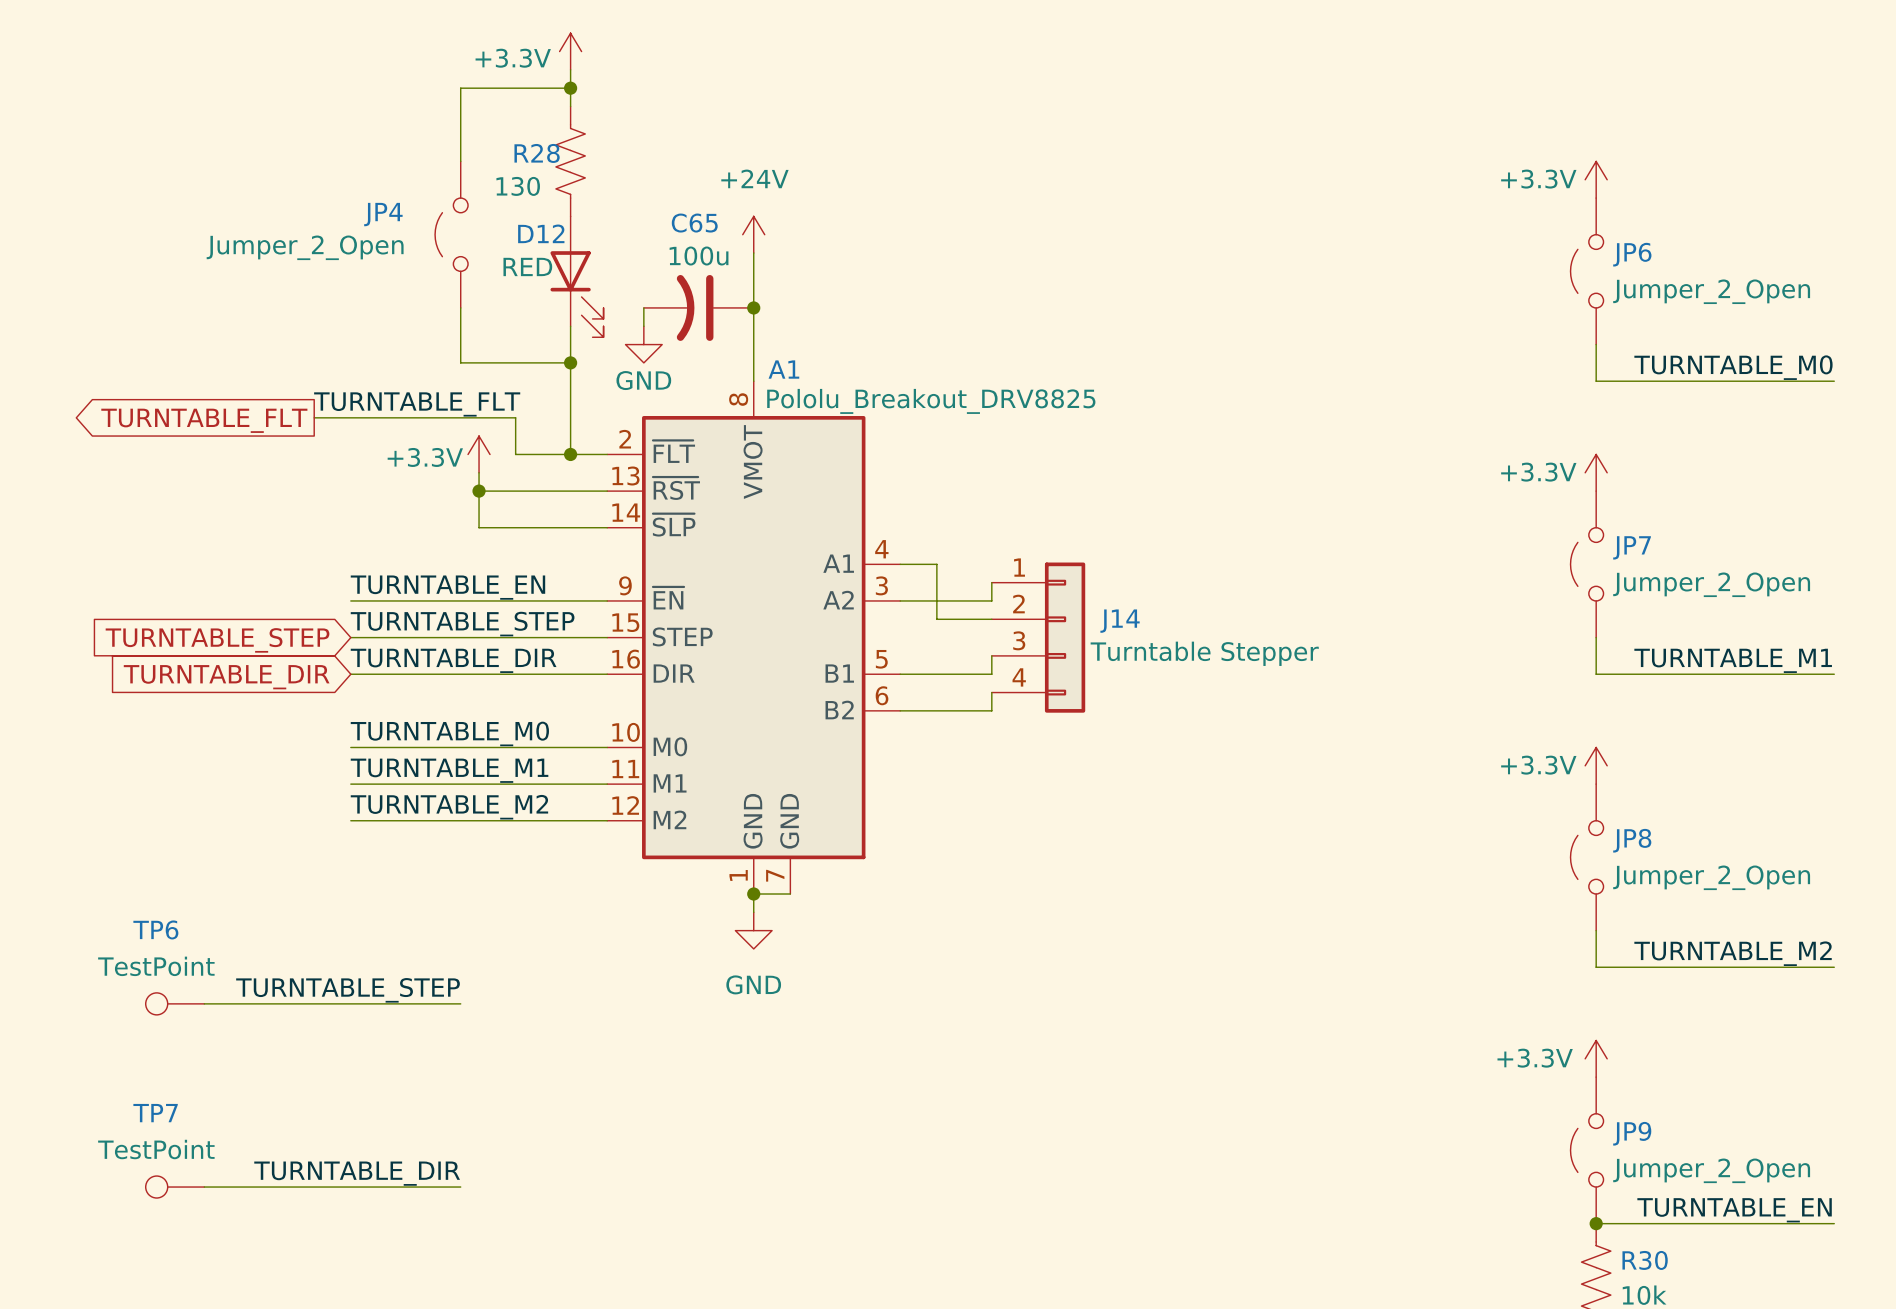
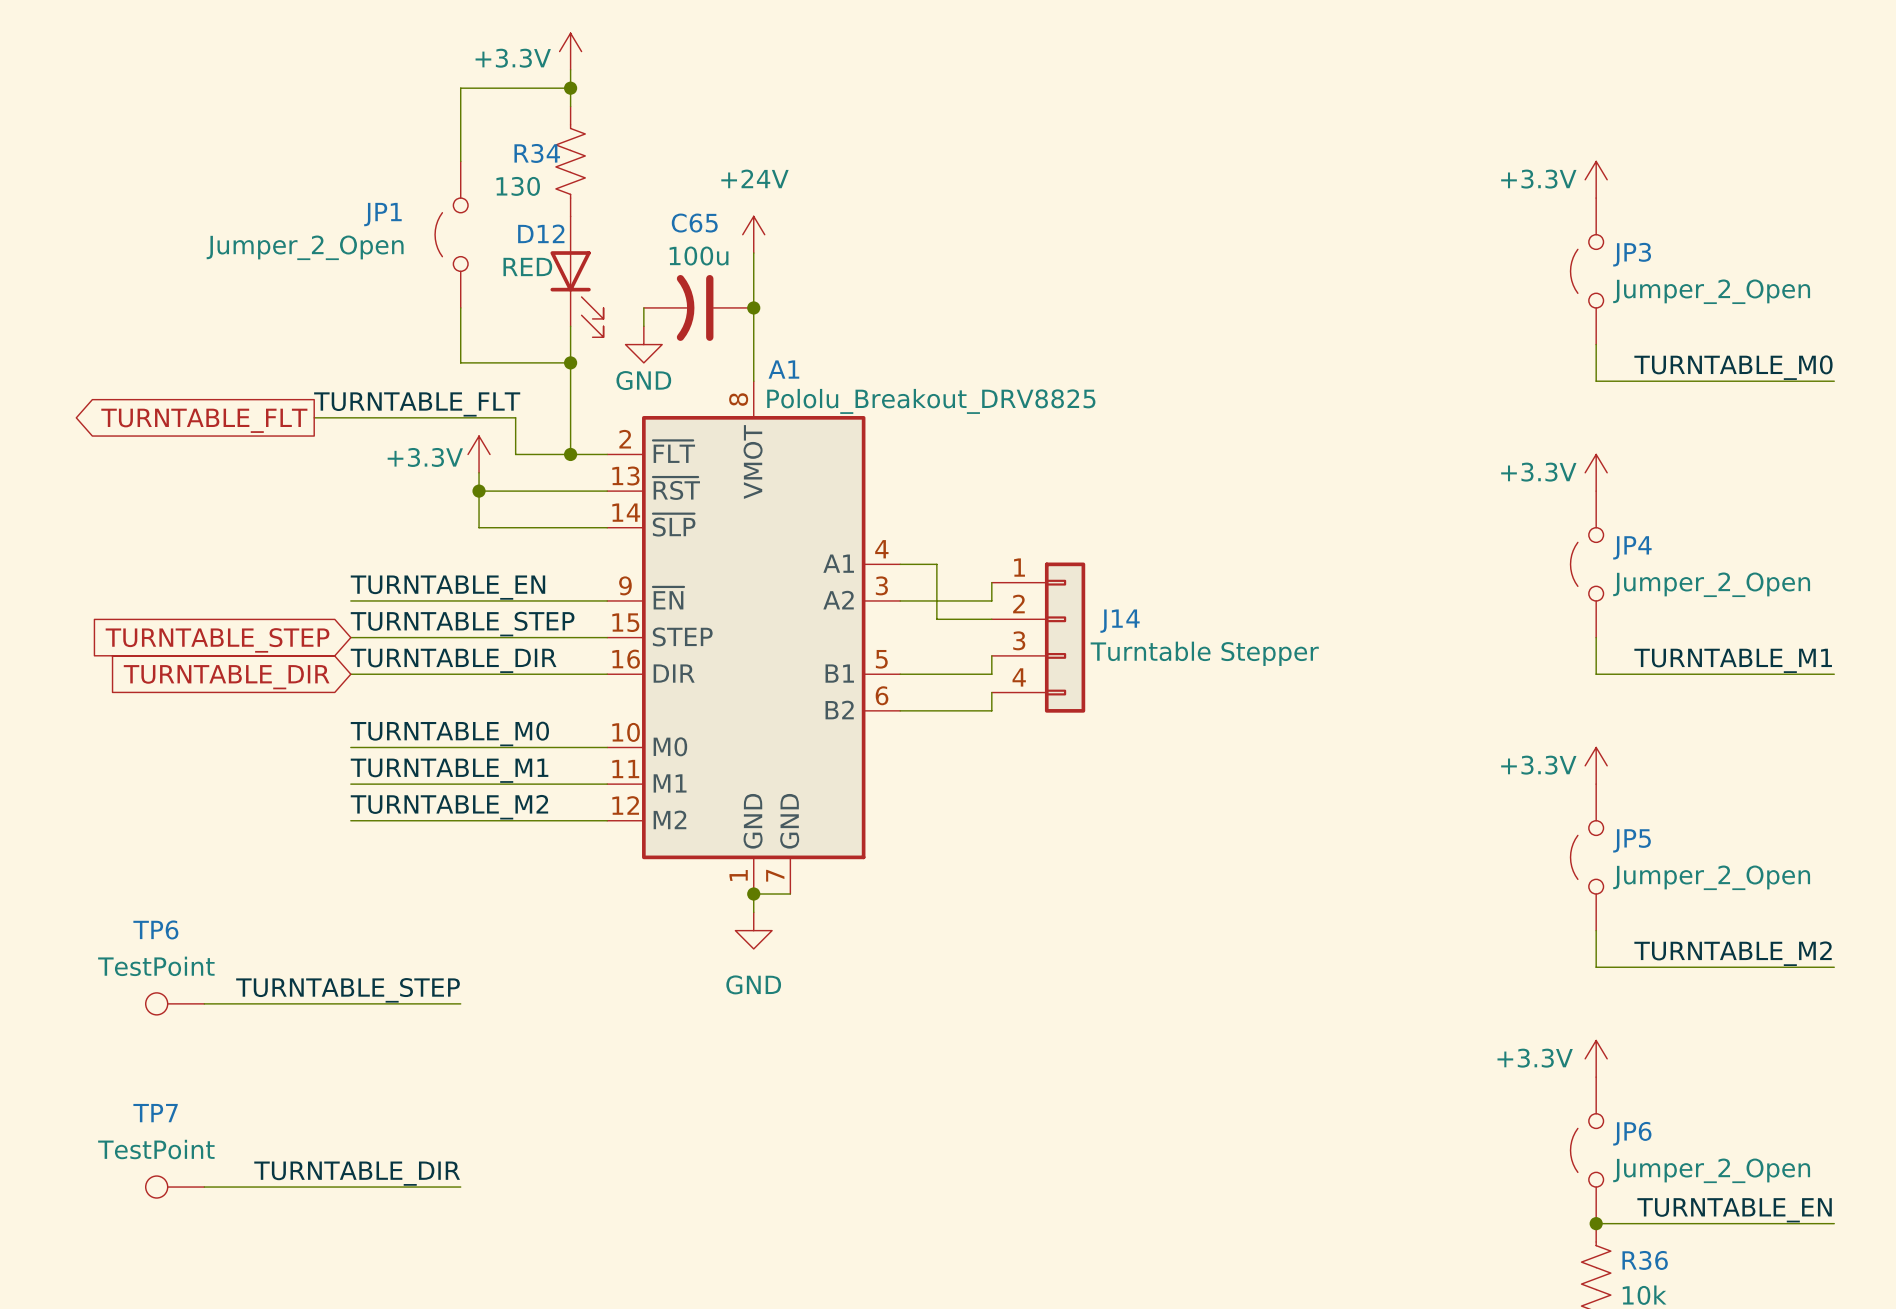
R28 name: R28 (537, 153) -> R34 (537, 153)
JP4 name: JP4 (383, 214) -> JP1 (382, 214)
JP6 name: JP6 (1632, 254) -> JP3 (1632, 254)
JP7 name: JP7 (1632, 547) -> JP4 (1632, 547)
JP8 name: JP8 (1632, 840) -> JP5 (1632, 840)
JP9 name: JP9 (1632, 1133) -> JP6 (1632, 1133)
R30 name: R30 (1645, 1260) -> R36 (1645, 1260)

